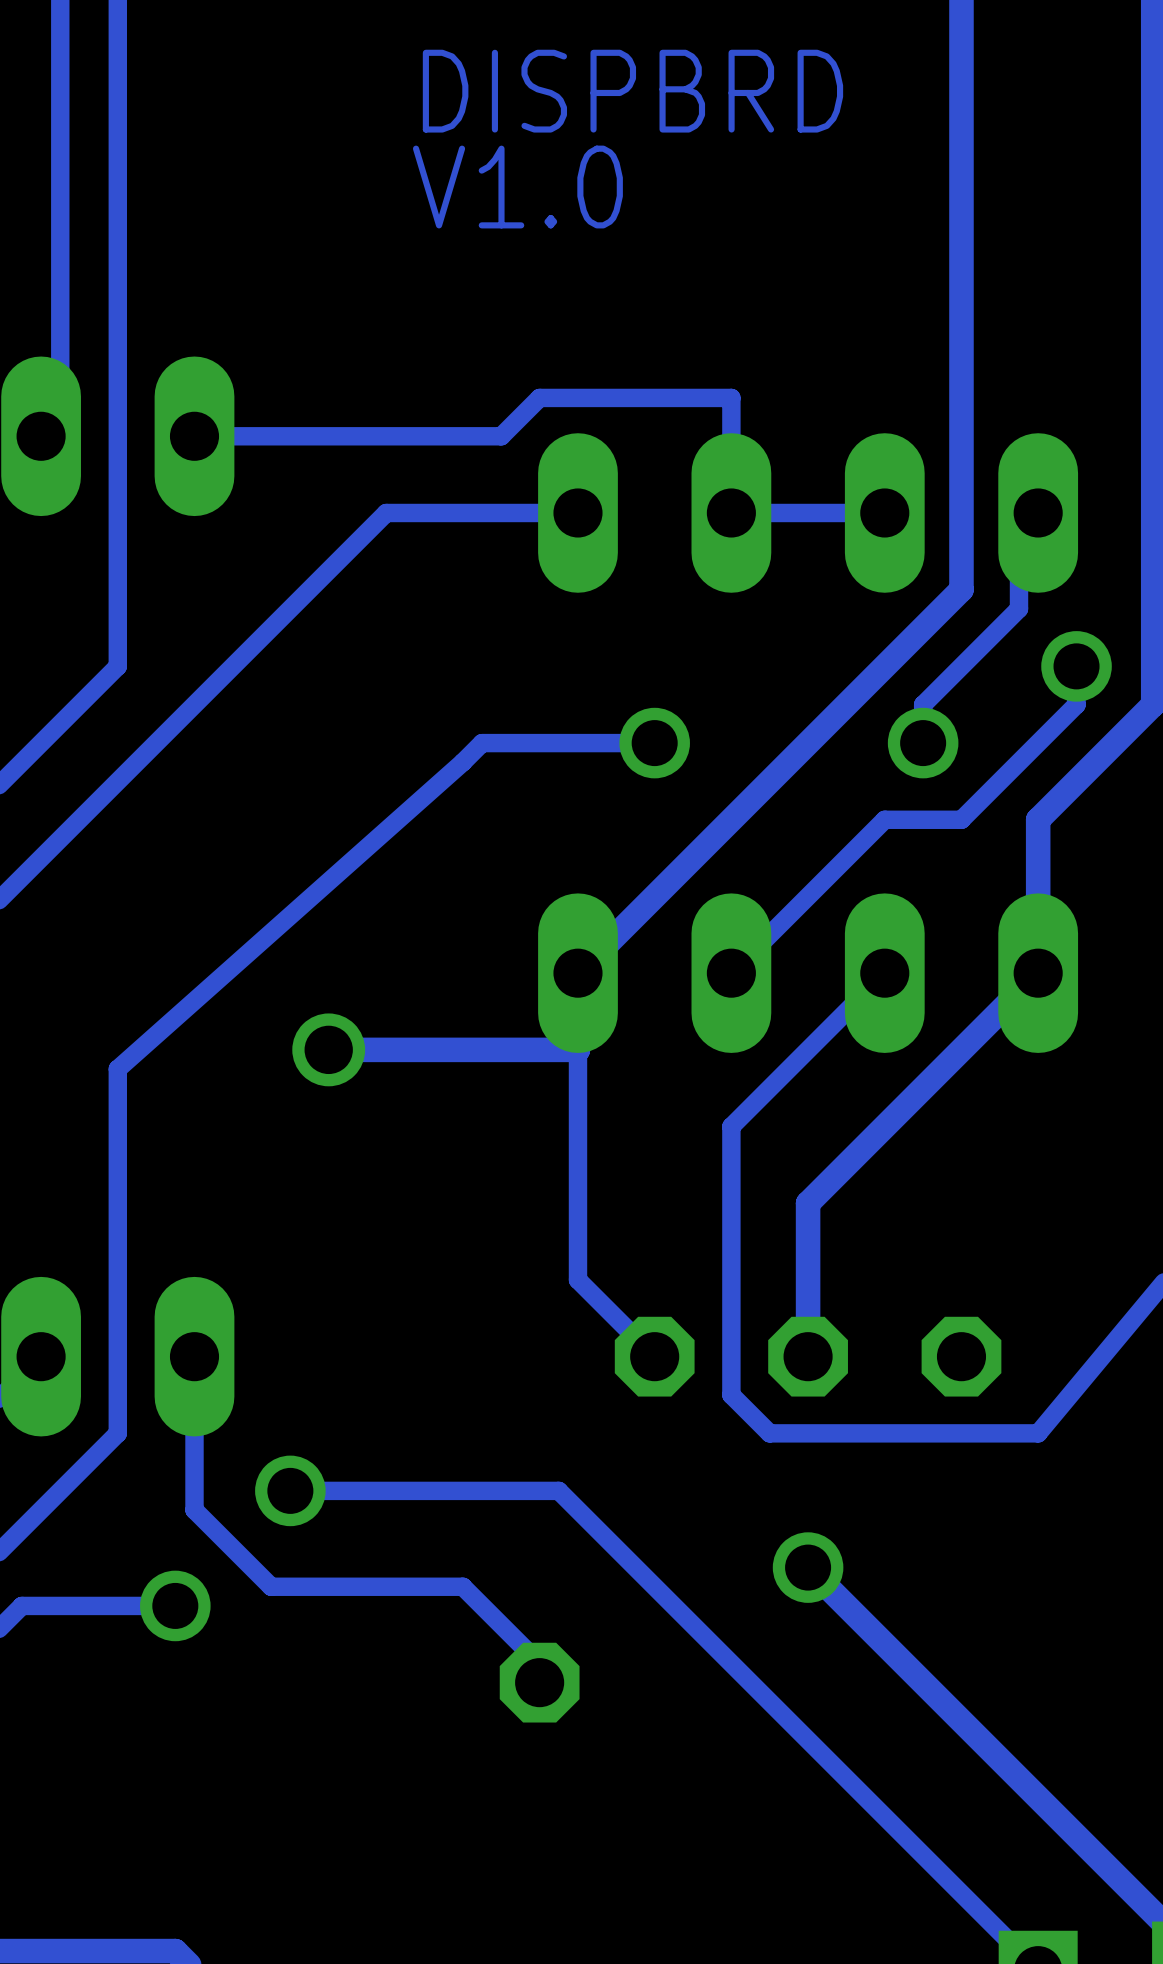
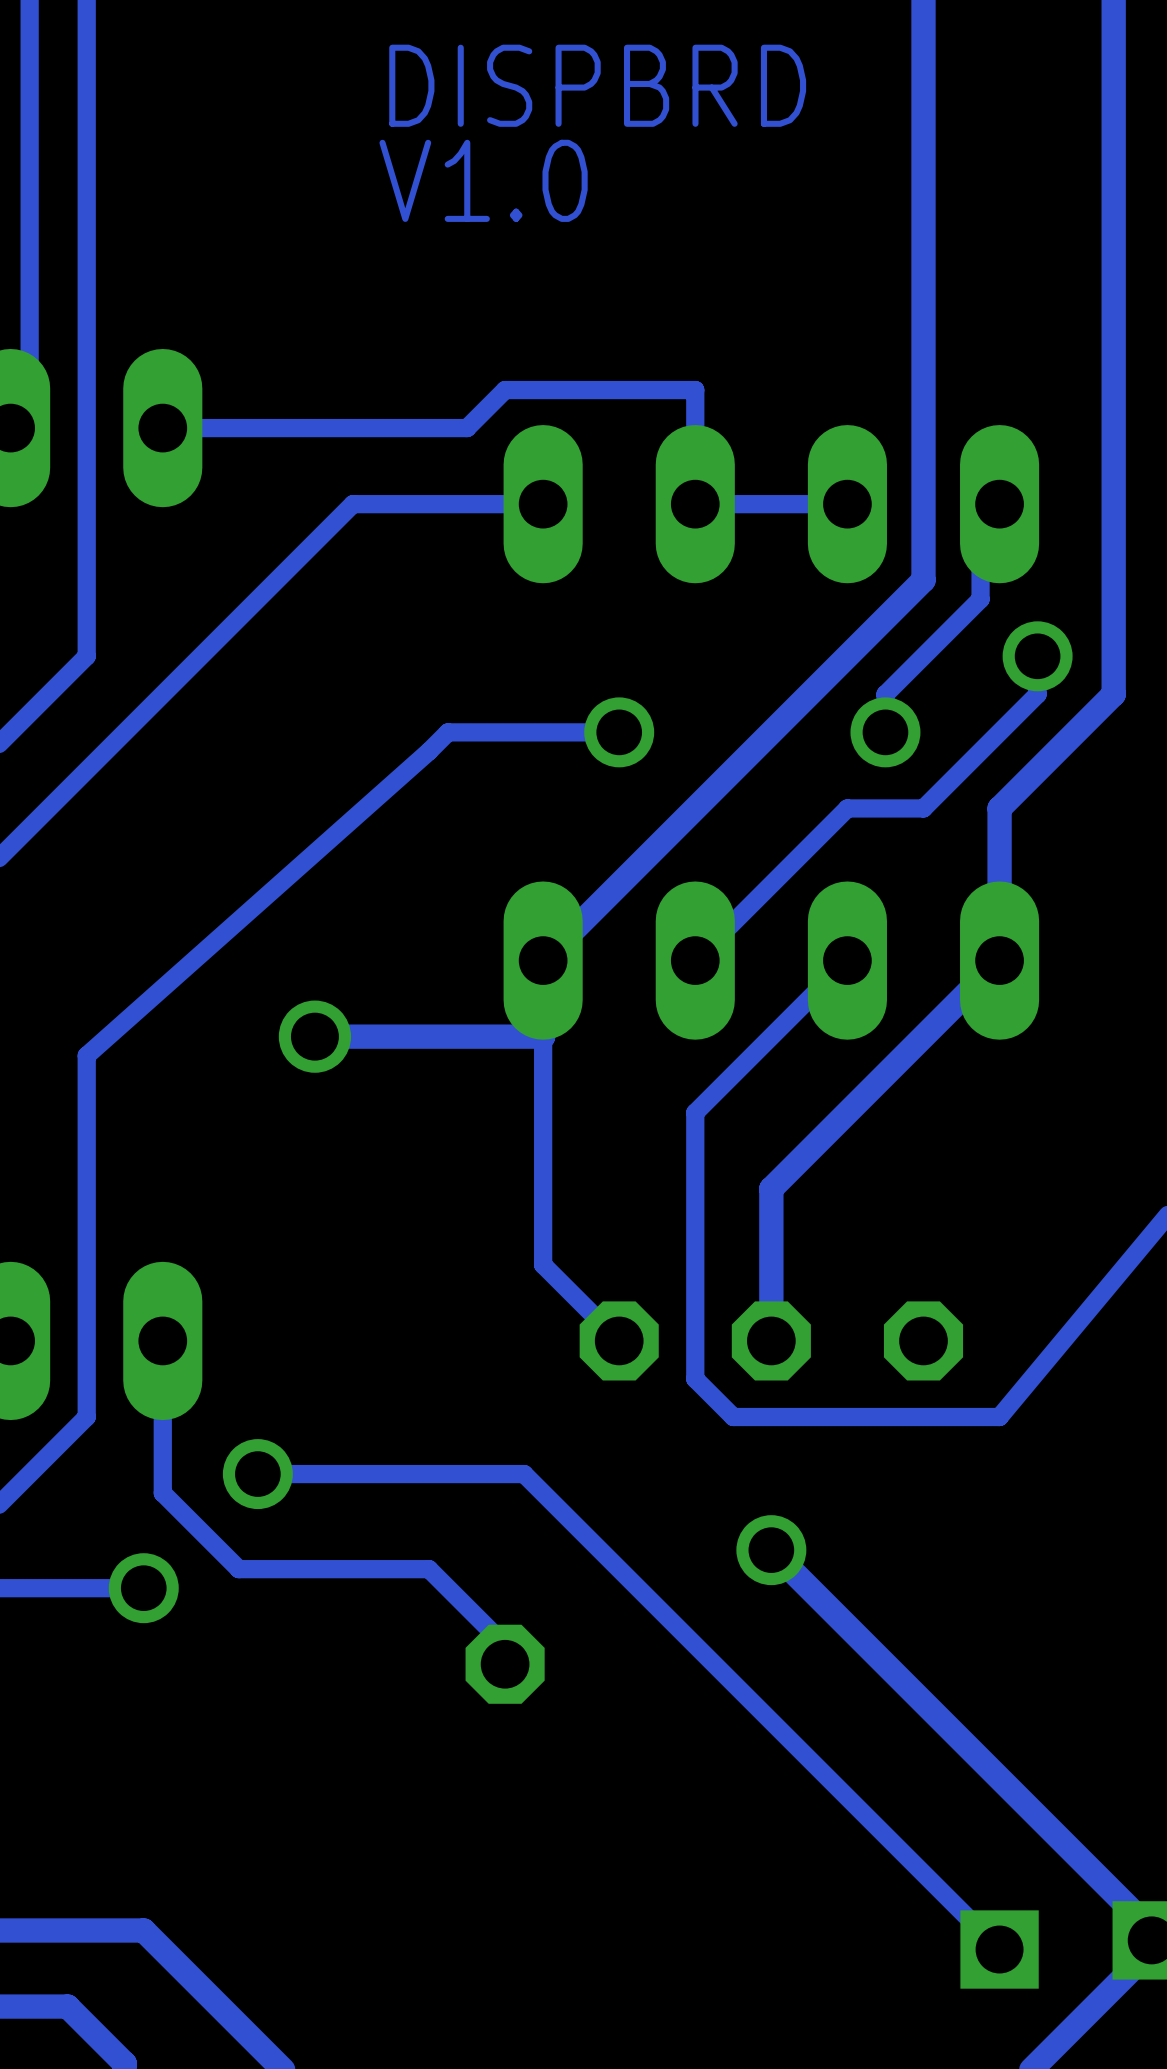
via position: (328, 1049) -> (314, 1036)

